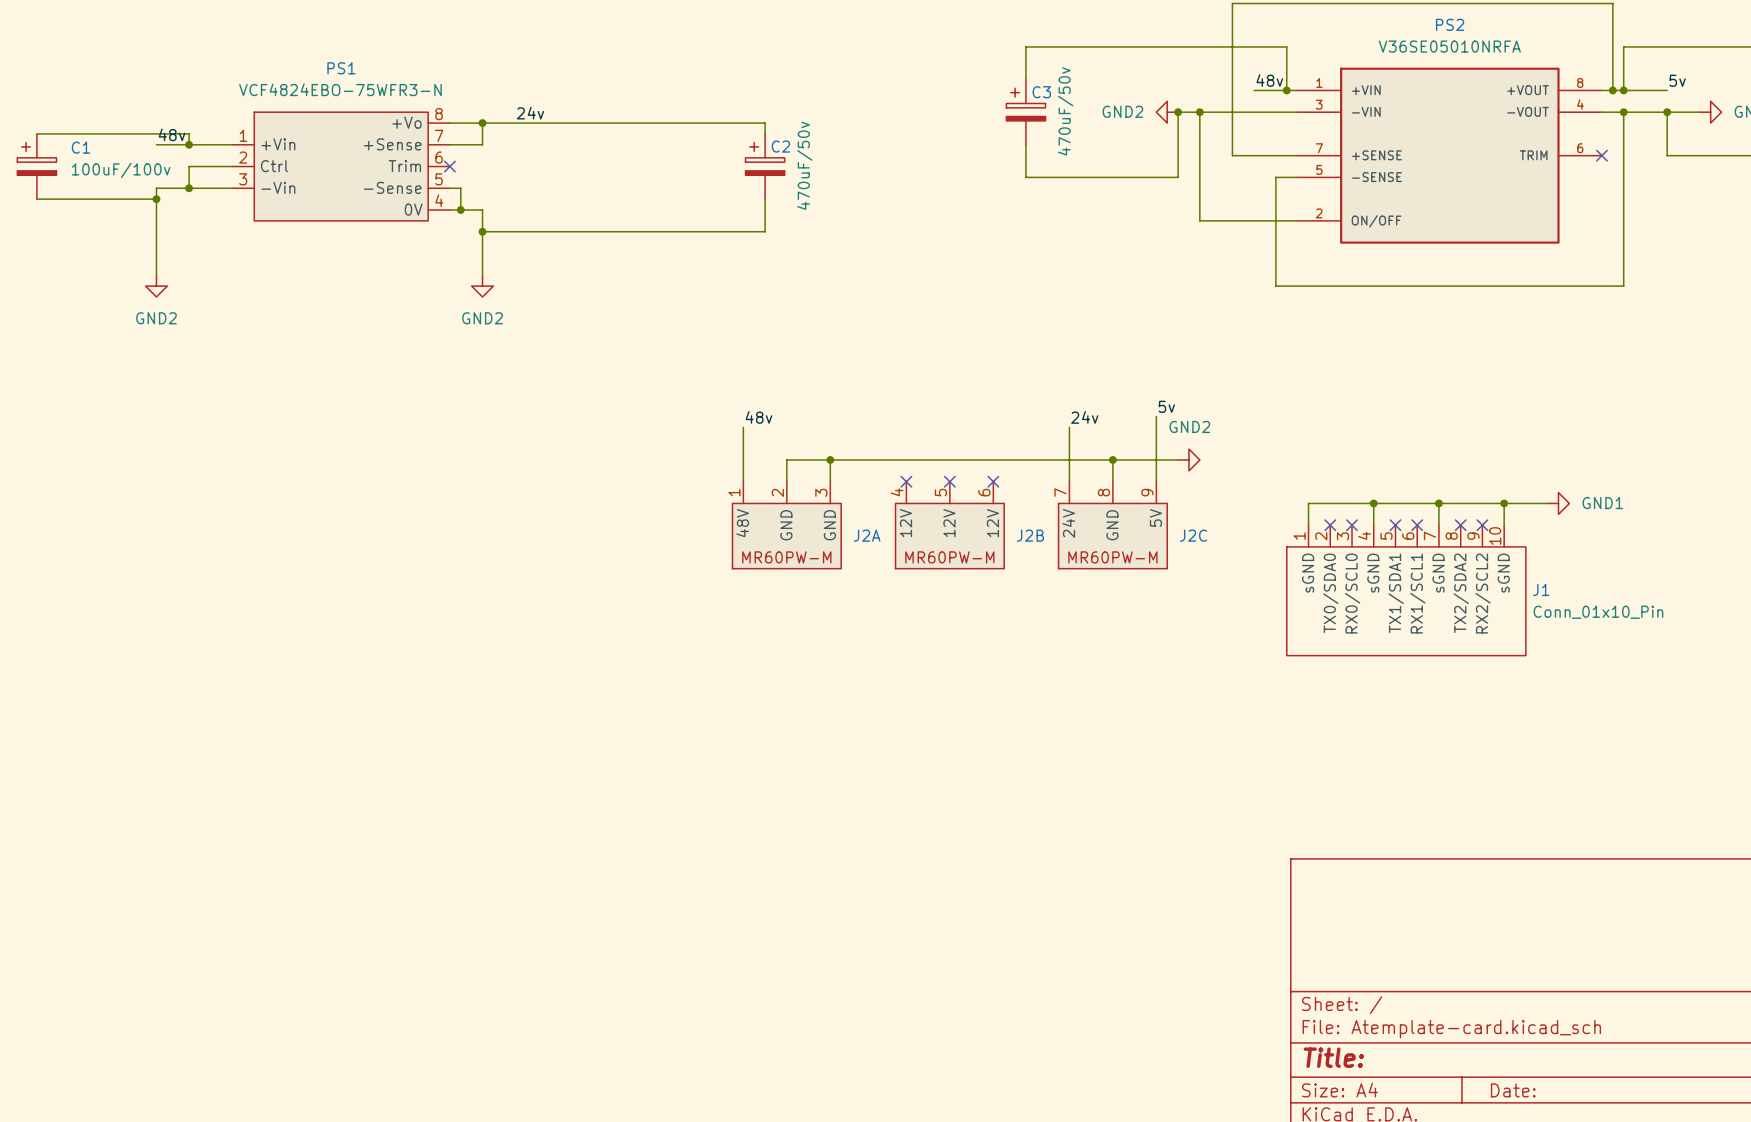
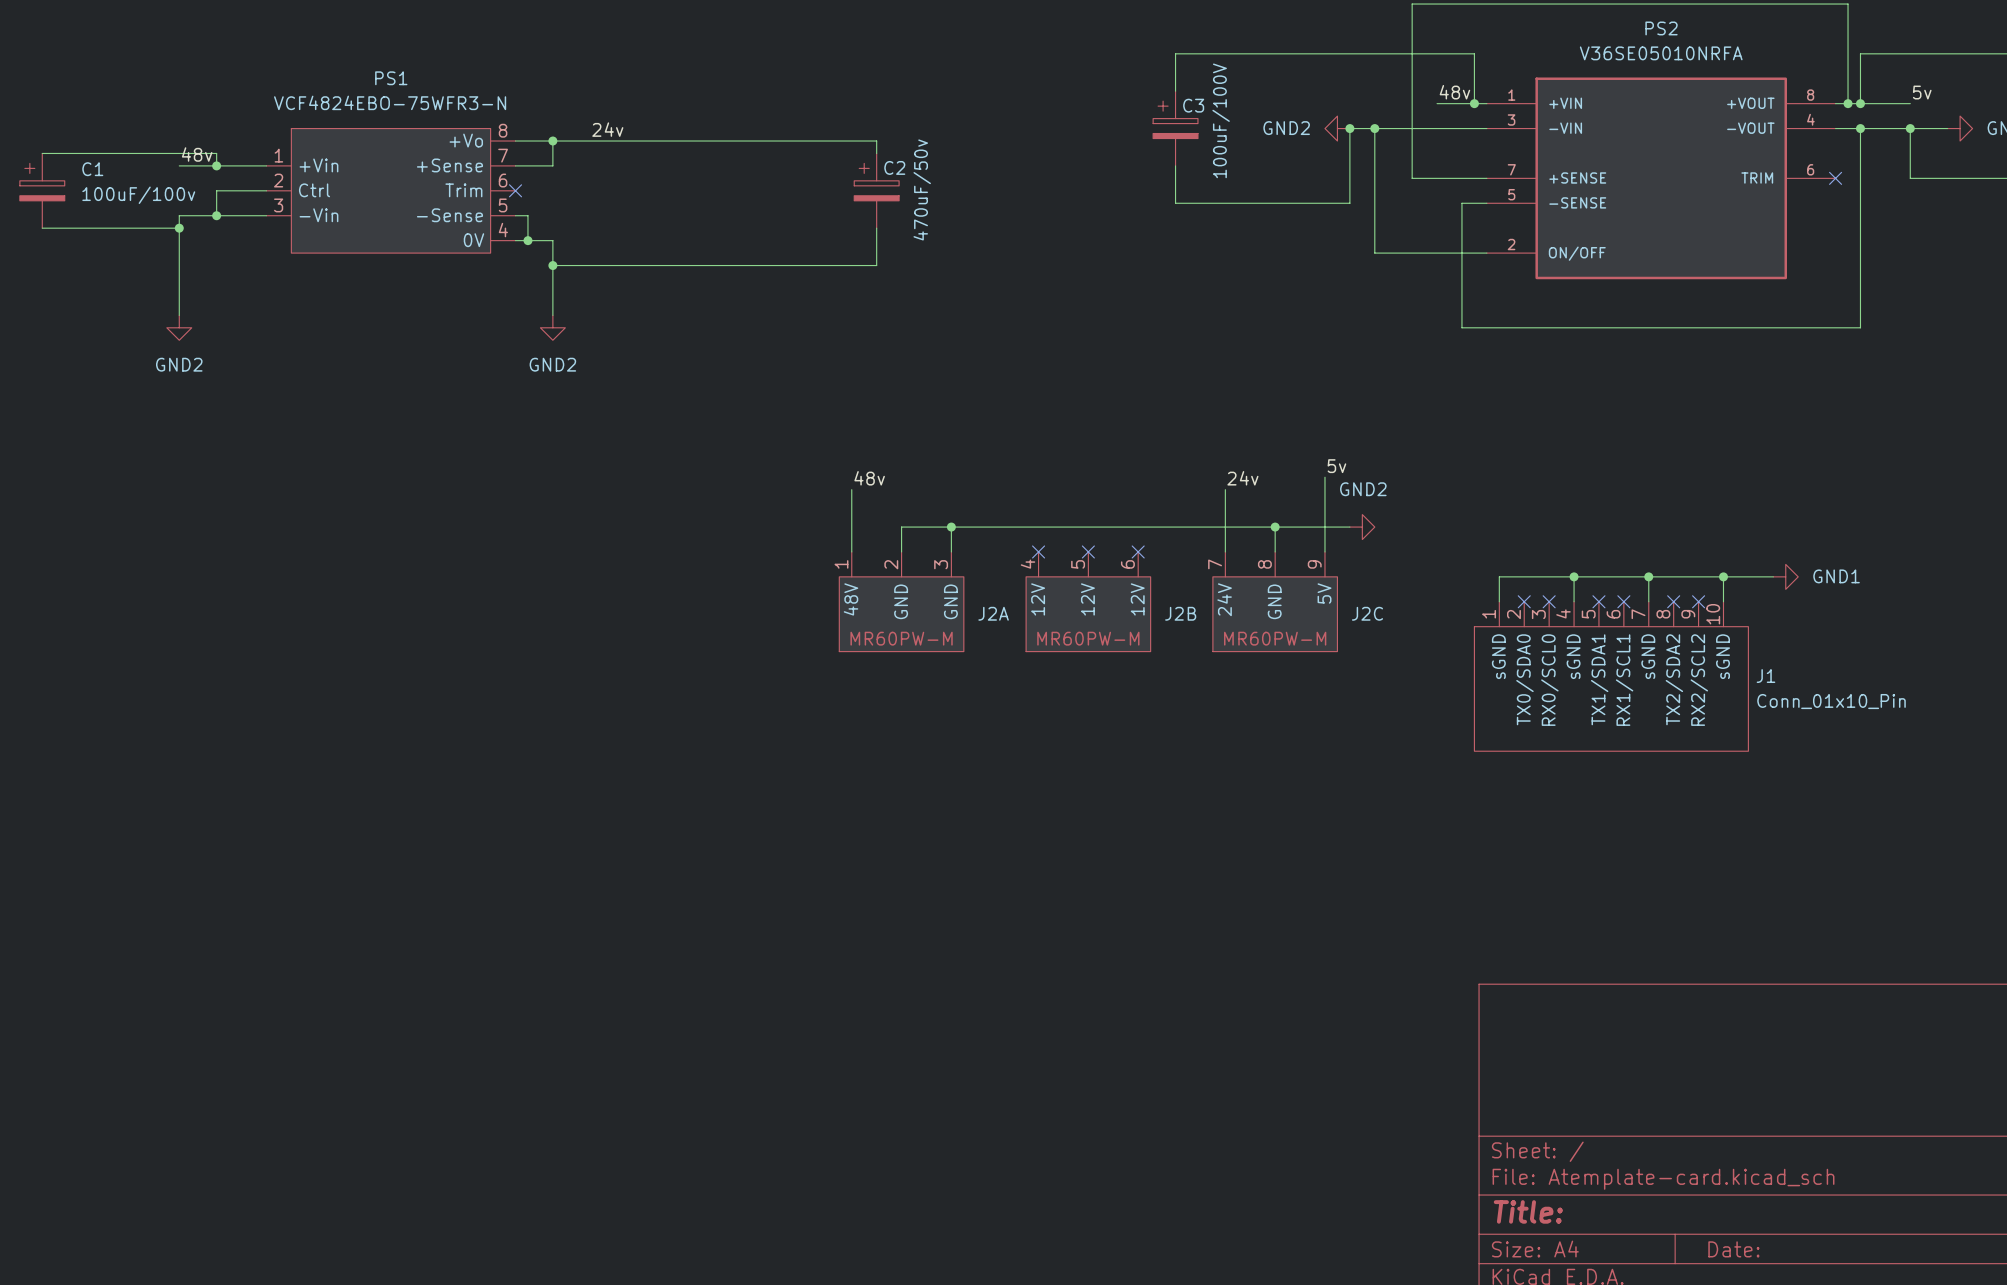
C3 value: 470uF/50v (1065, 111) -> 100uF/100V (1221, 120)

